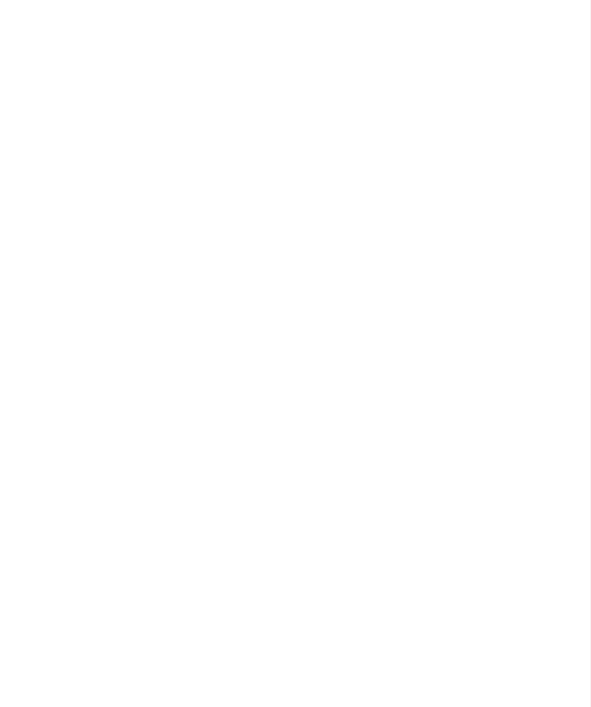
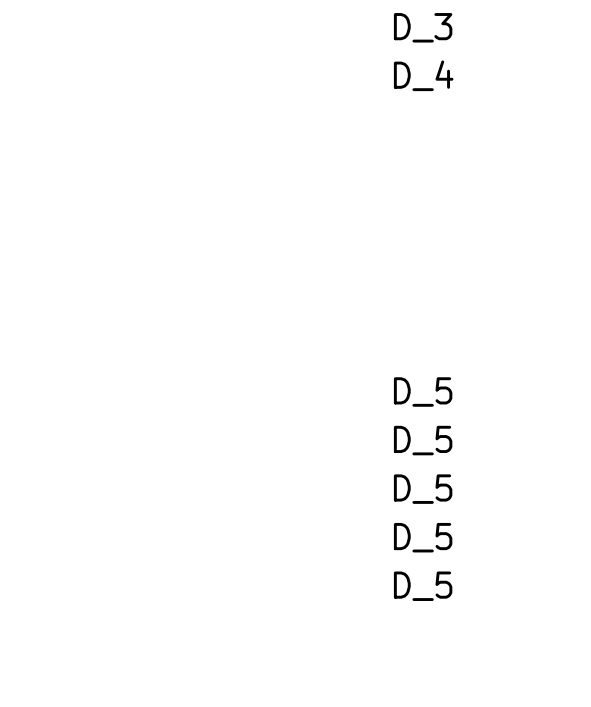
label: none -> D_3 (423, 27)
label: none -> D_4 (423, 75)
label: none -> D_5 (423, 392)
label: none -> D_5 (423, 440)
label: none -> D_5 (423, 489)
label: none -> D_5 (423, 537)
label: none -> D_5 (423, 586)

